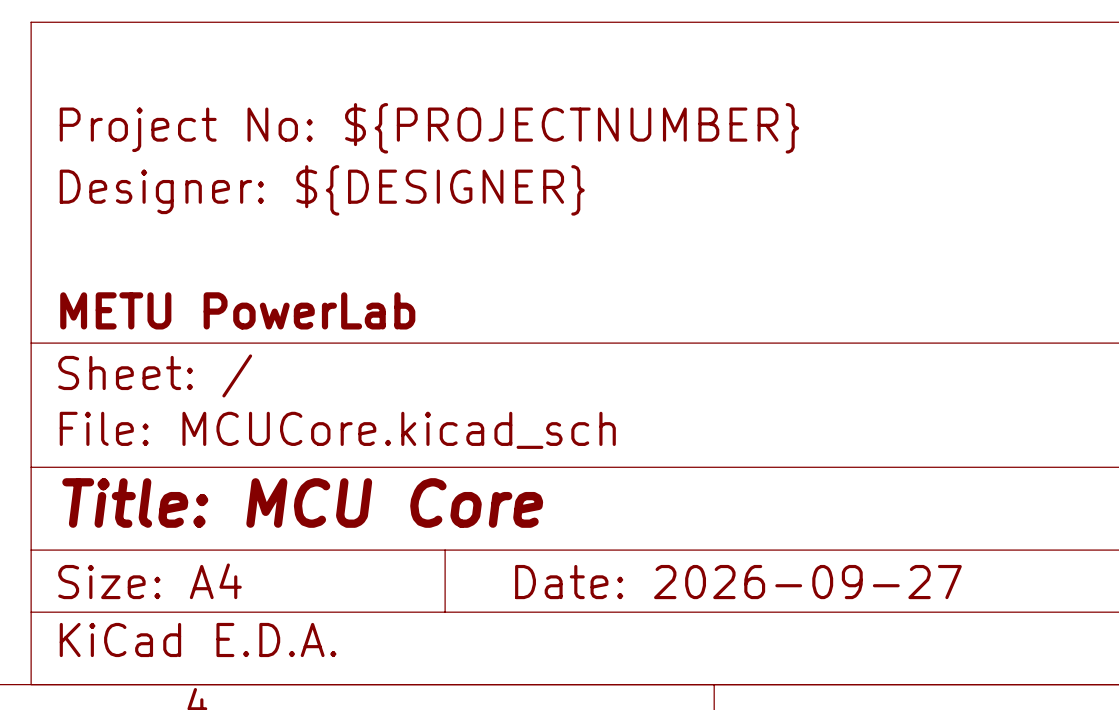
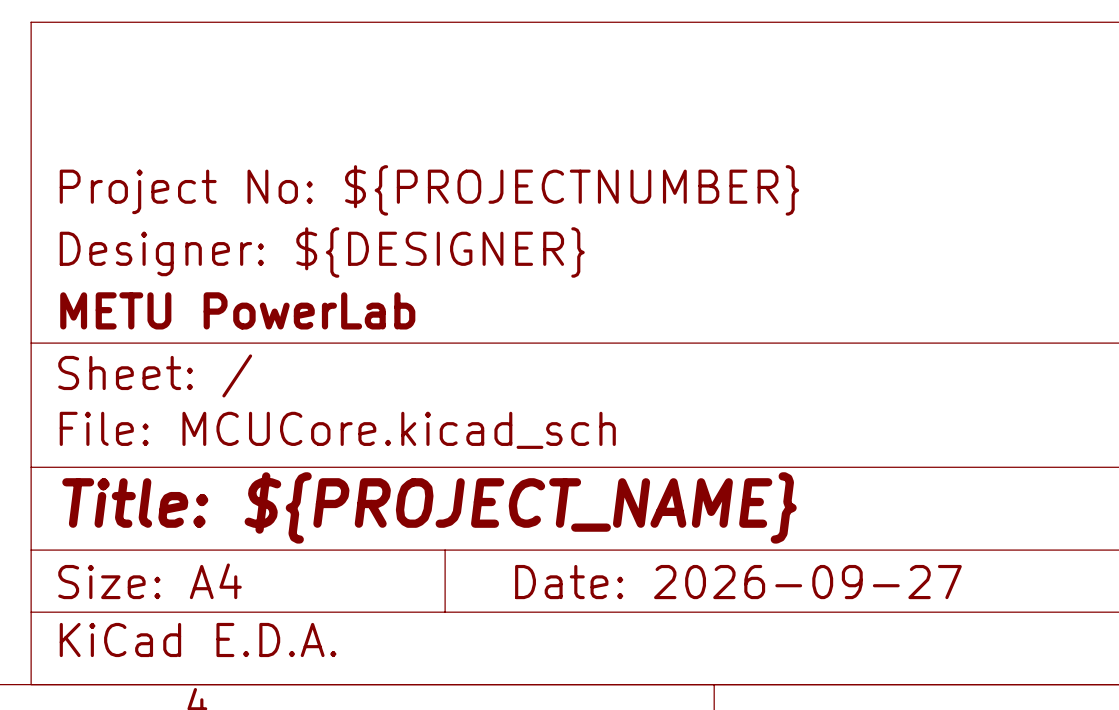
title block: Project No: ${PROJECTNUMBER} (429, 128) -> none
title block: Designer: ${DESIGNER} (322, 190) -> Project No: ${PROJECTNUMBER} (429, 190)
title block: none -> Designer: ${DESIGNER} (322, 252)
title block: Title: MCU Core (302, 502) -> Title: ${PROJECT_NAME} (429, 507)

